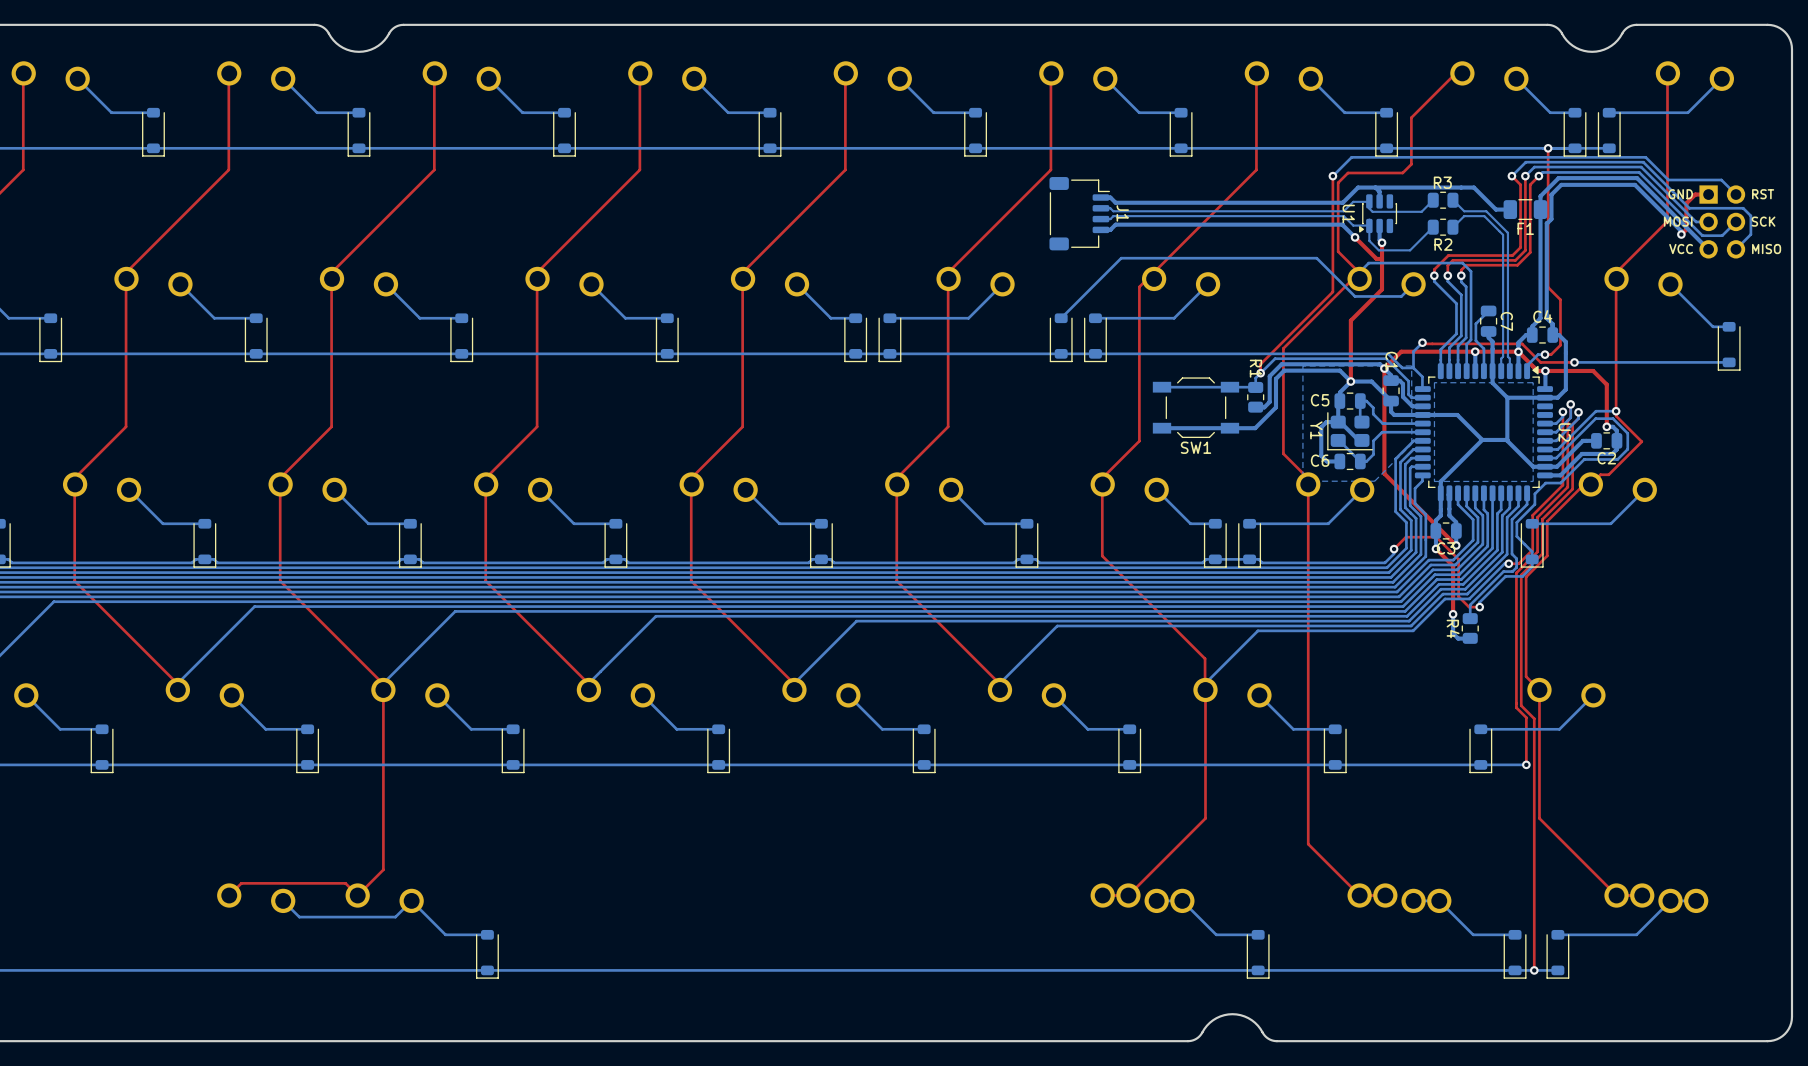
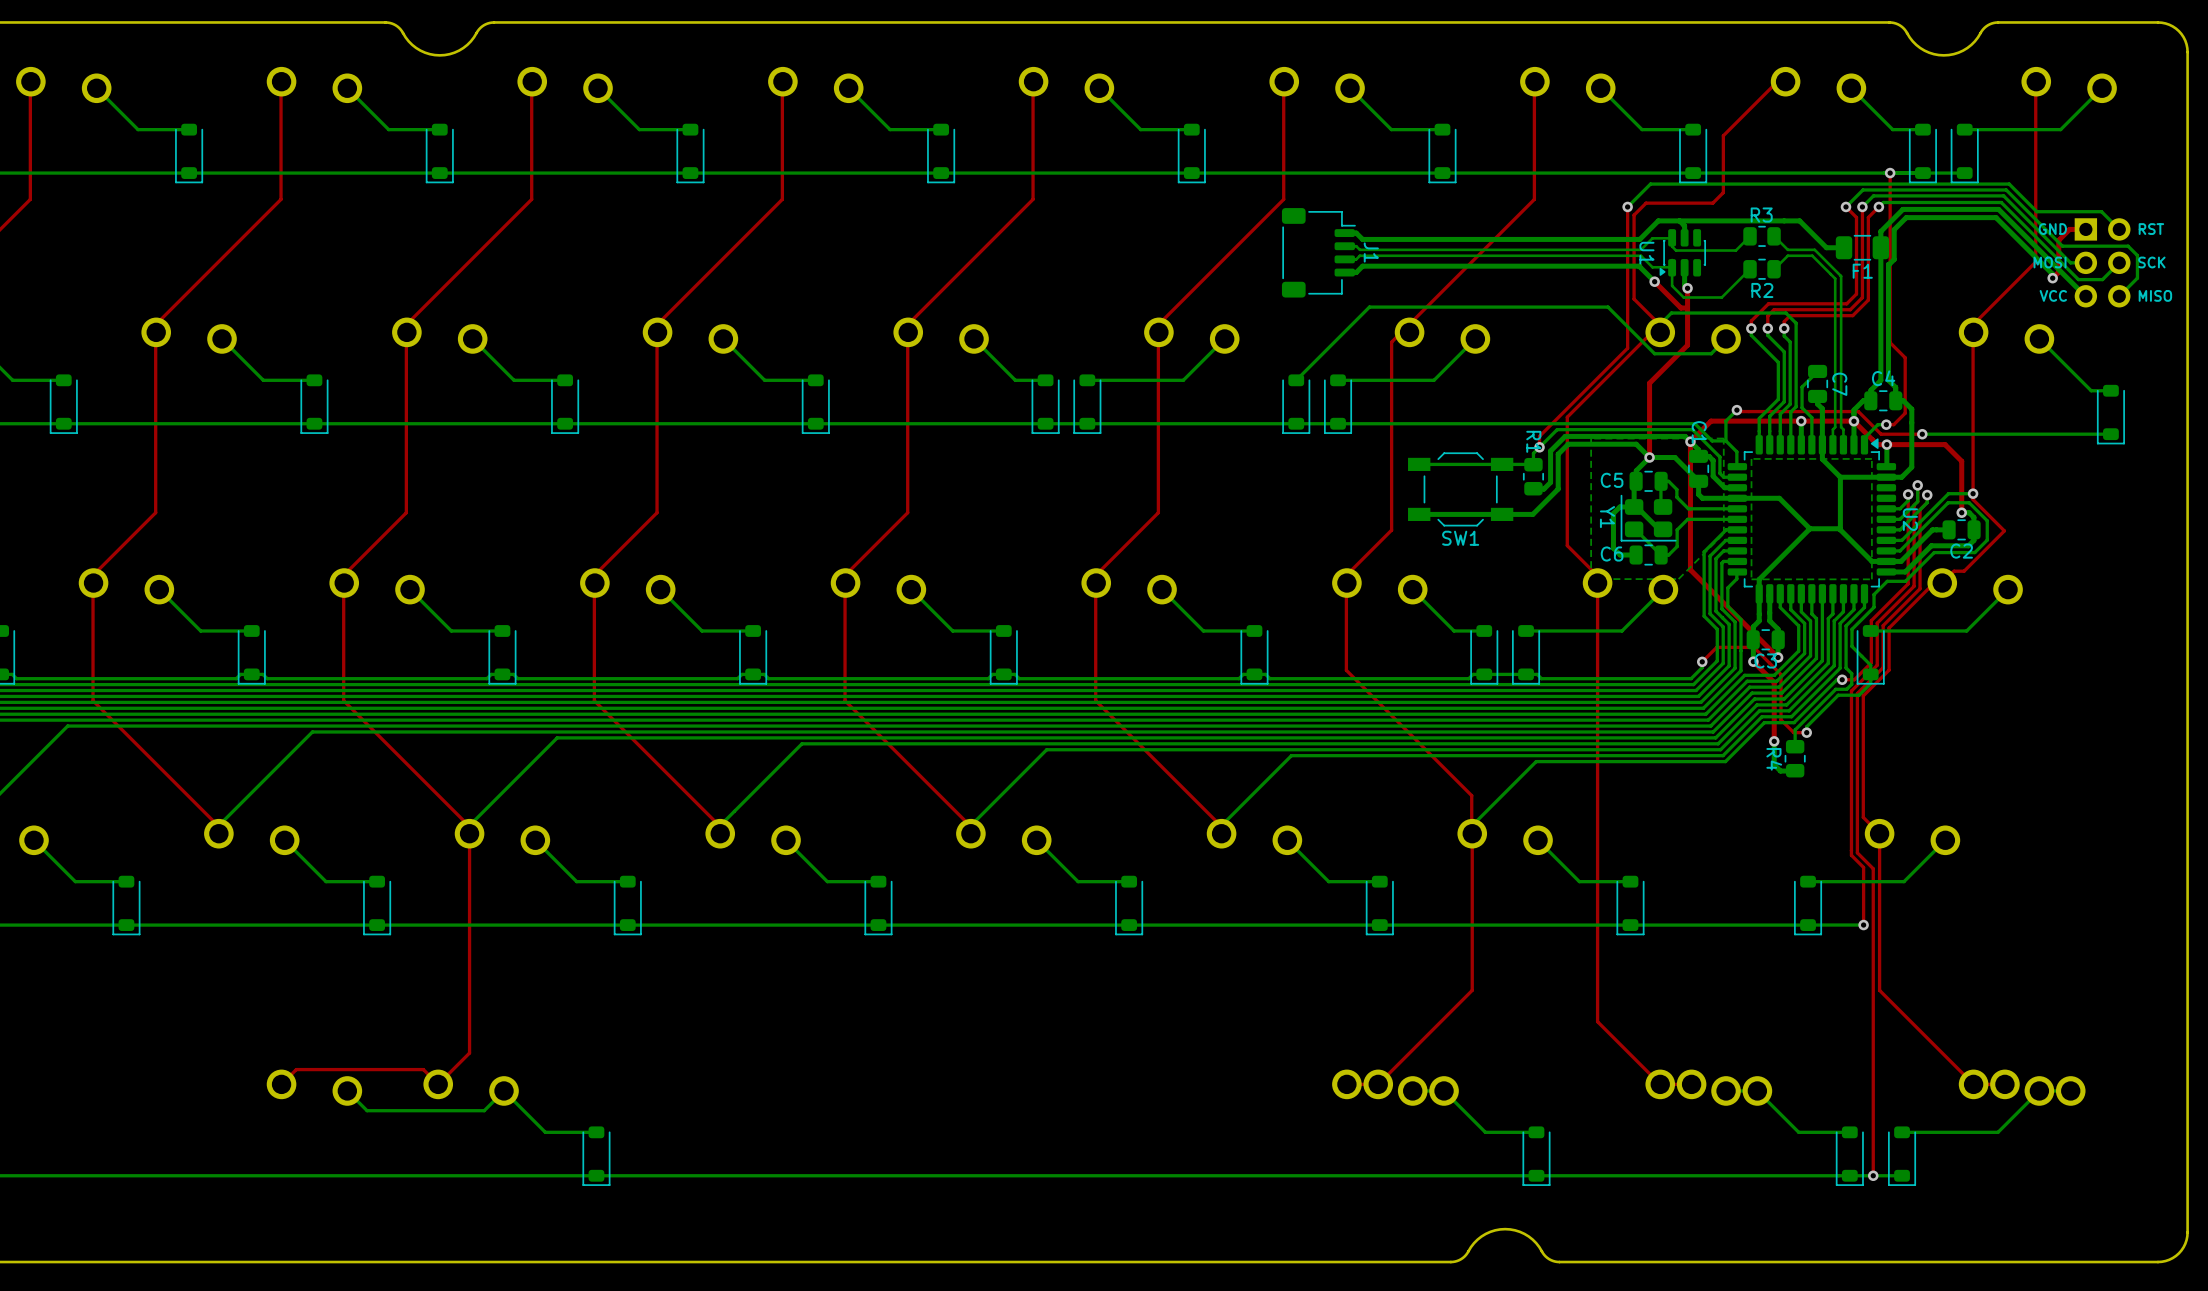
part footprint: [1699, 185, 1746, 259] -> [2074, 218, 2131, 308]

